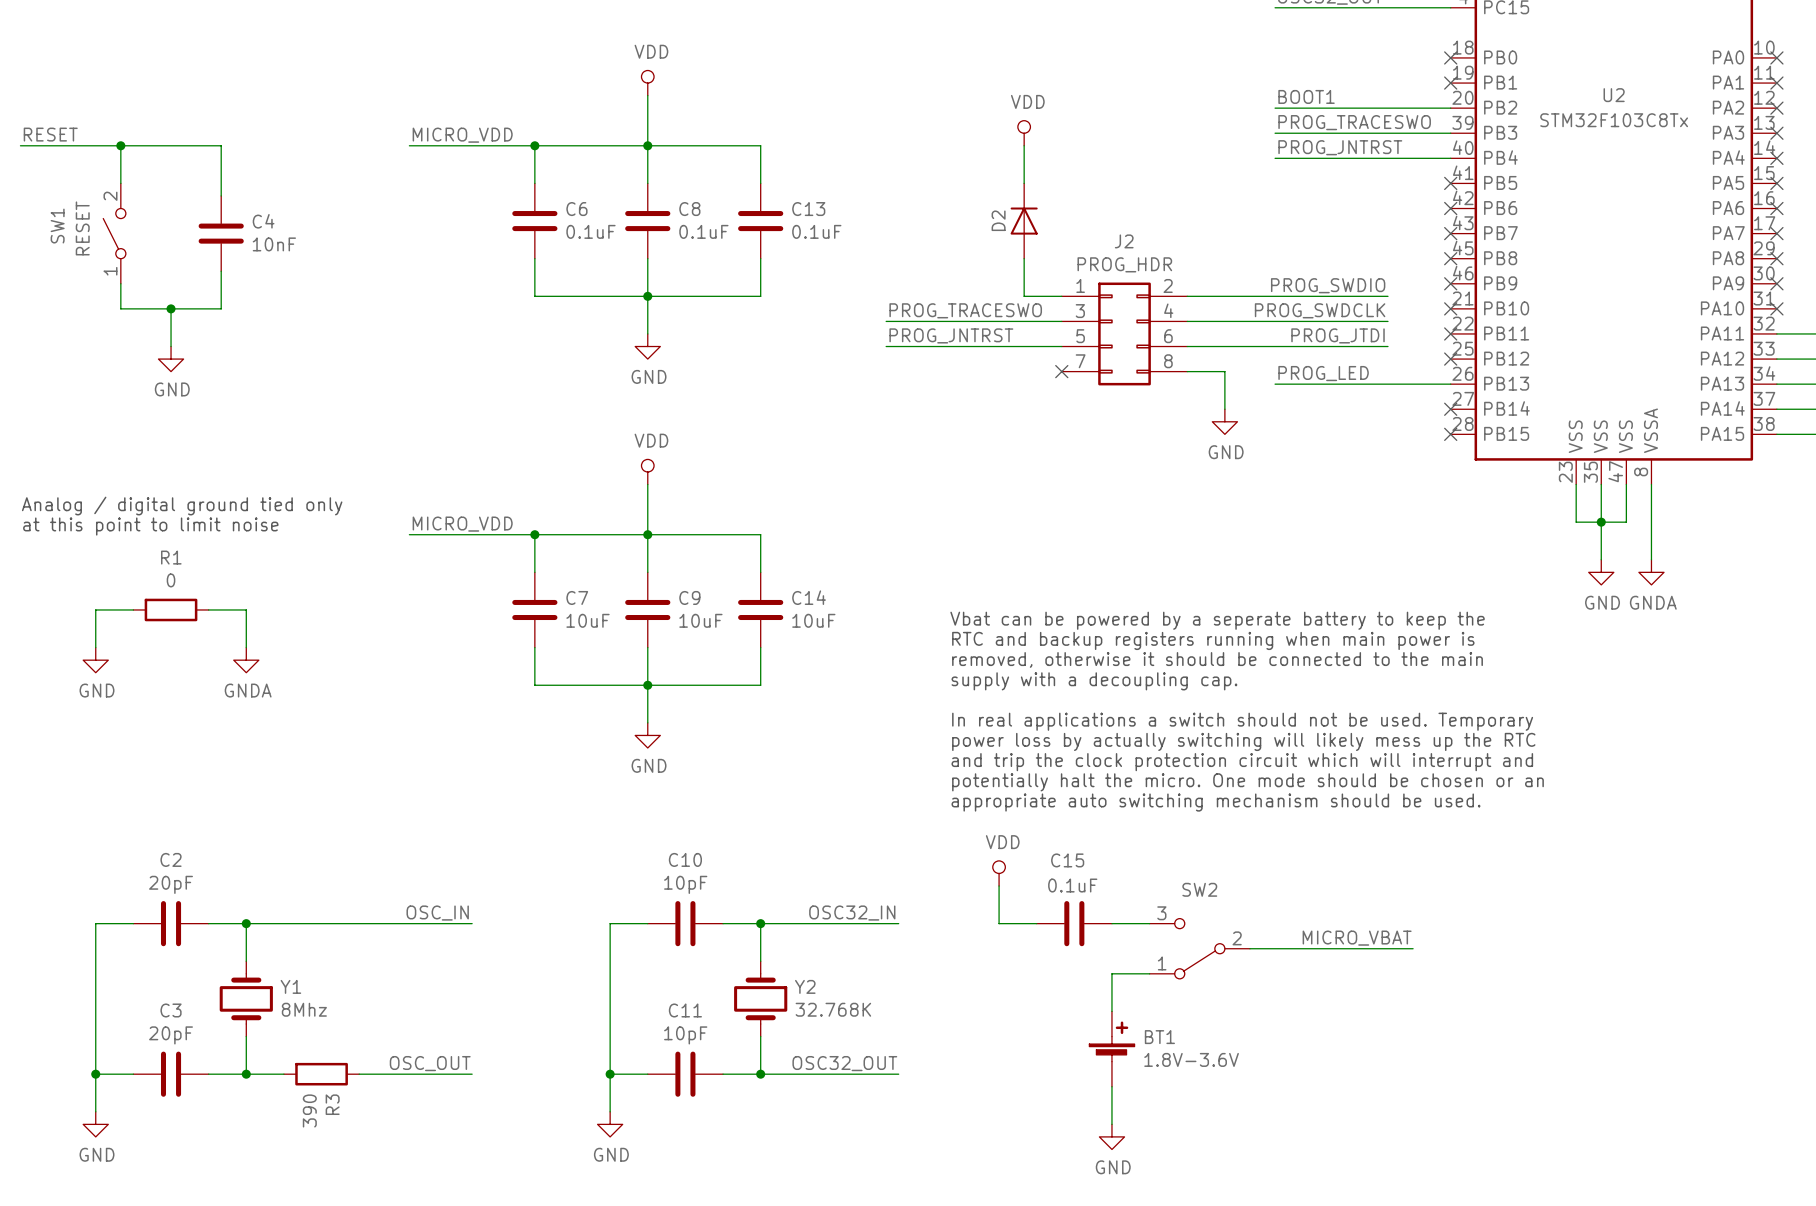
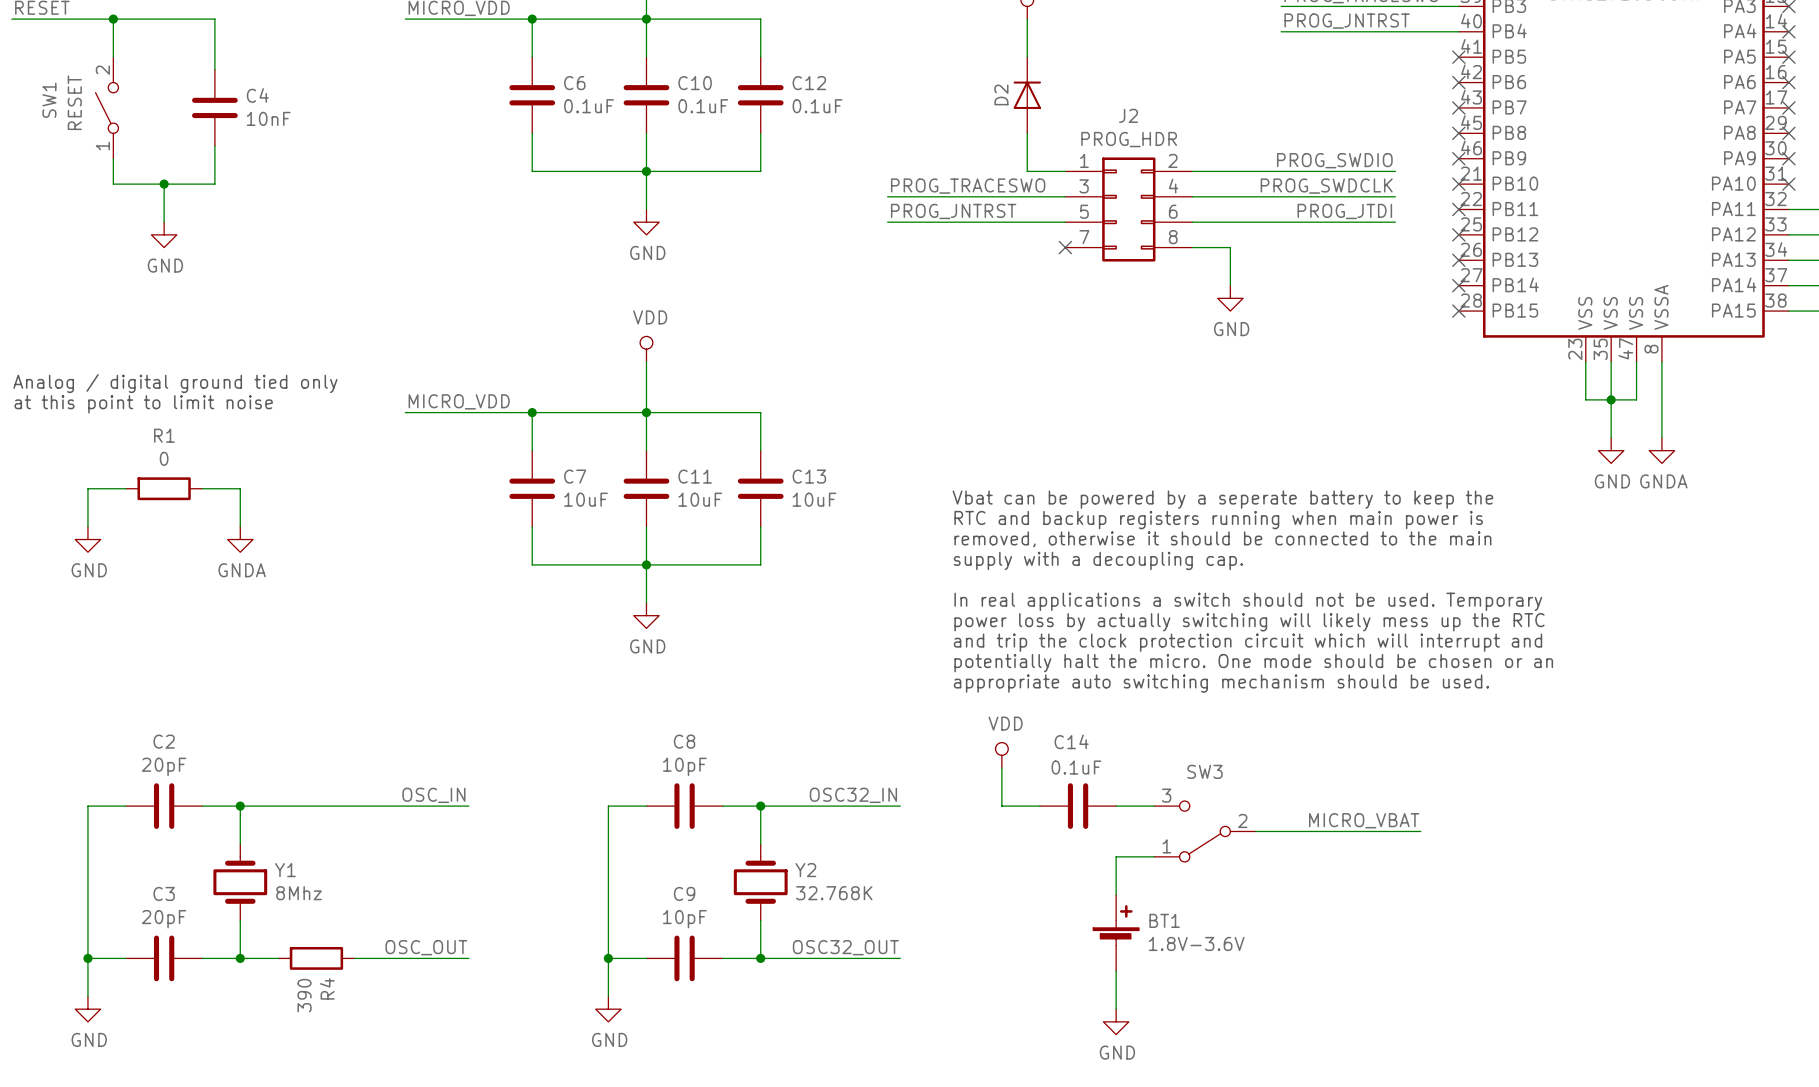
C8 name: C8 (689, 209) -> C10 (695, 83)
C13 name: C13 (808, 209) -> C12 (809, 83)
label: PROG_LED (1323, 373) -> none
wire: (1275, 384) (1450, 384) -> none
no-connect mark: none -> (1458, 260)
C9 name: C9 (689, 597) -> C11 (695, 476)
C14 name: C14 (809, 597) -> C13 (809, 476)
C10 name: C10 (685, 859) -> C8 (684, 741)
C15 name: C15 (1067, 860) -> C14 (1071, 741)
SW2 name: SW2 (1199, 889) -> SW3 (1204, 771)
C11 name: C11 (685, 1010) -> C9 (684, 893)
R3 name: R3 (332, 1104) -> R4 (327, 988)

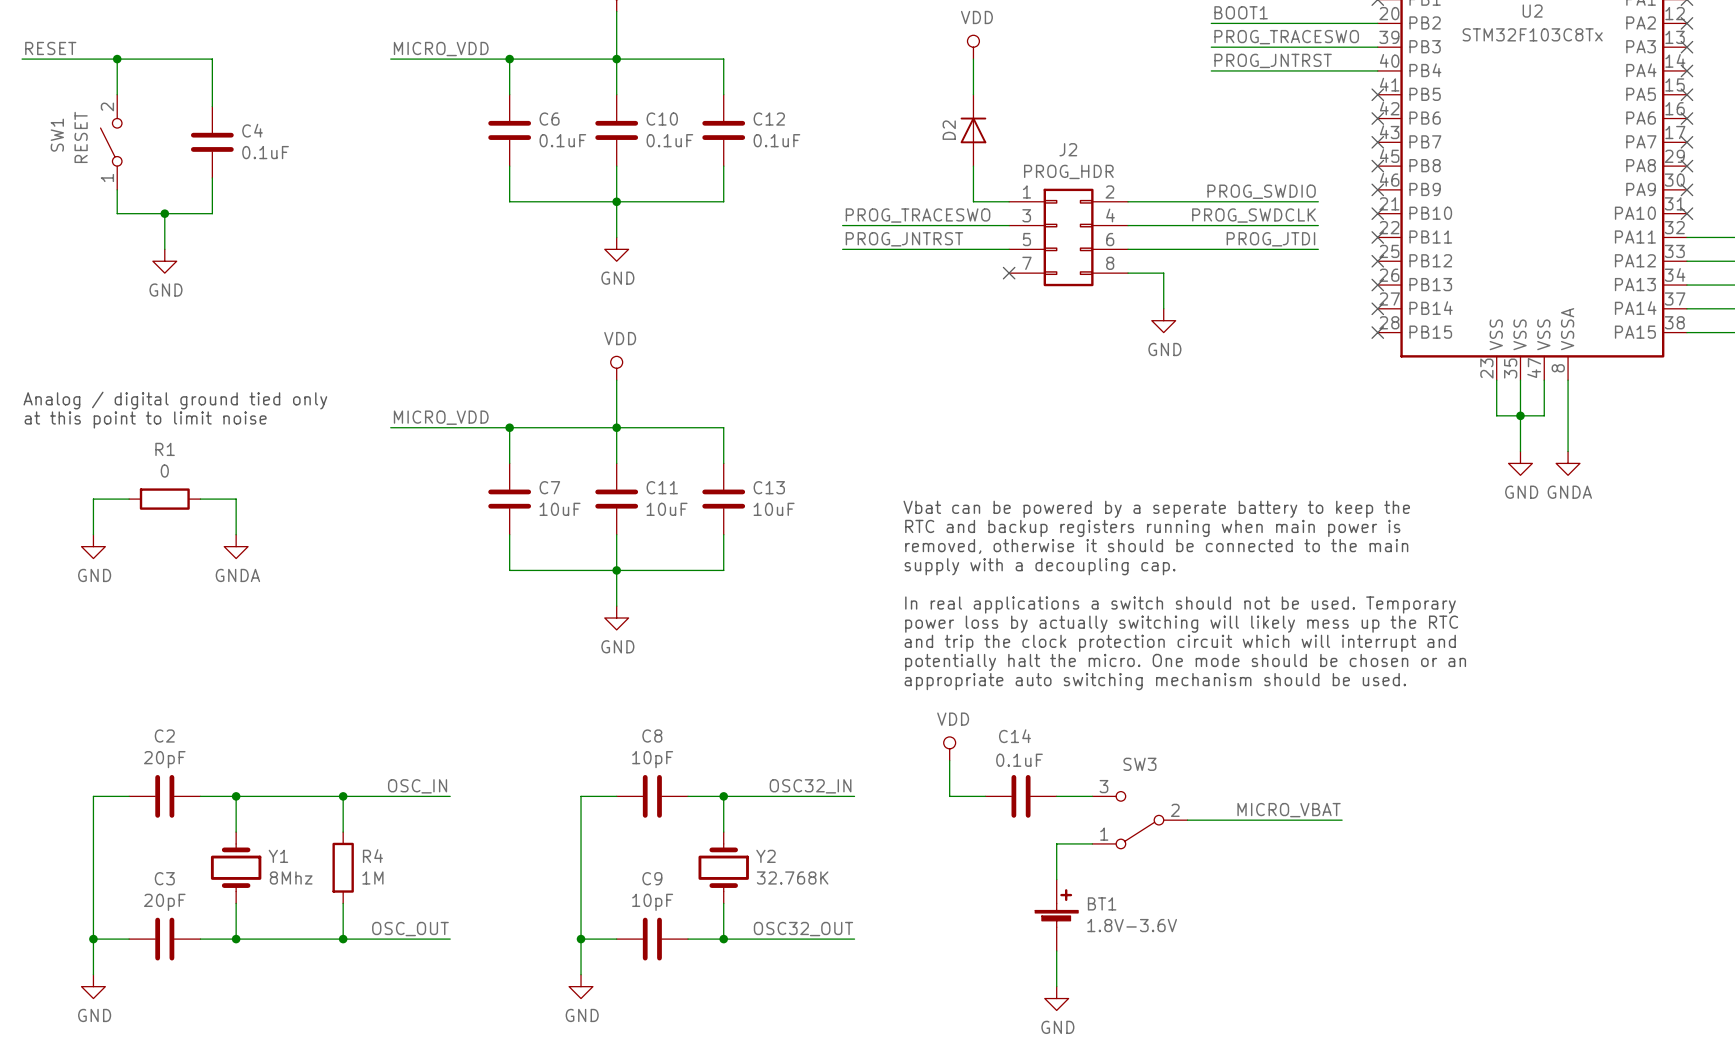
C4 value: 10nF (268, 118) -> 0.1uF (265, 152)
wire: none -> (343, 796) (343, 832)
junction: none -> (343, 796)
wire: none -> (343, 903) (343, 939) (271, 939)
R4 rotation: 0° (316, 958) -> 90° clockwise (343, 867)
R4 position: (316, 958) -> (343, 867)
junction: none -> (343, 939)
R4 name position: R4 (327, 988) -> R4 (372, 856)
R4 value: 390 (304, 995) -> 1M (372, 877)

